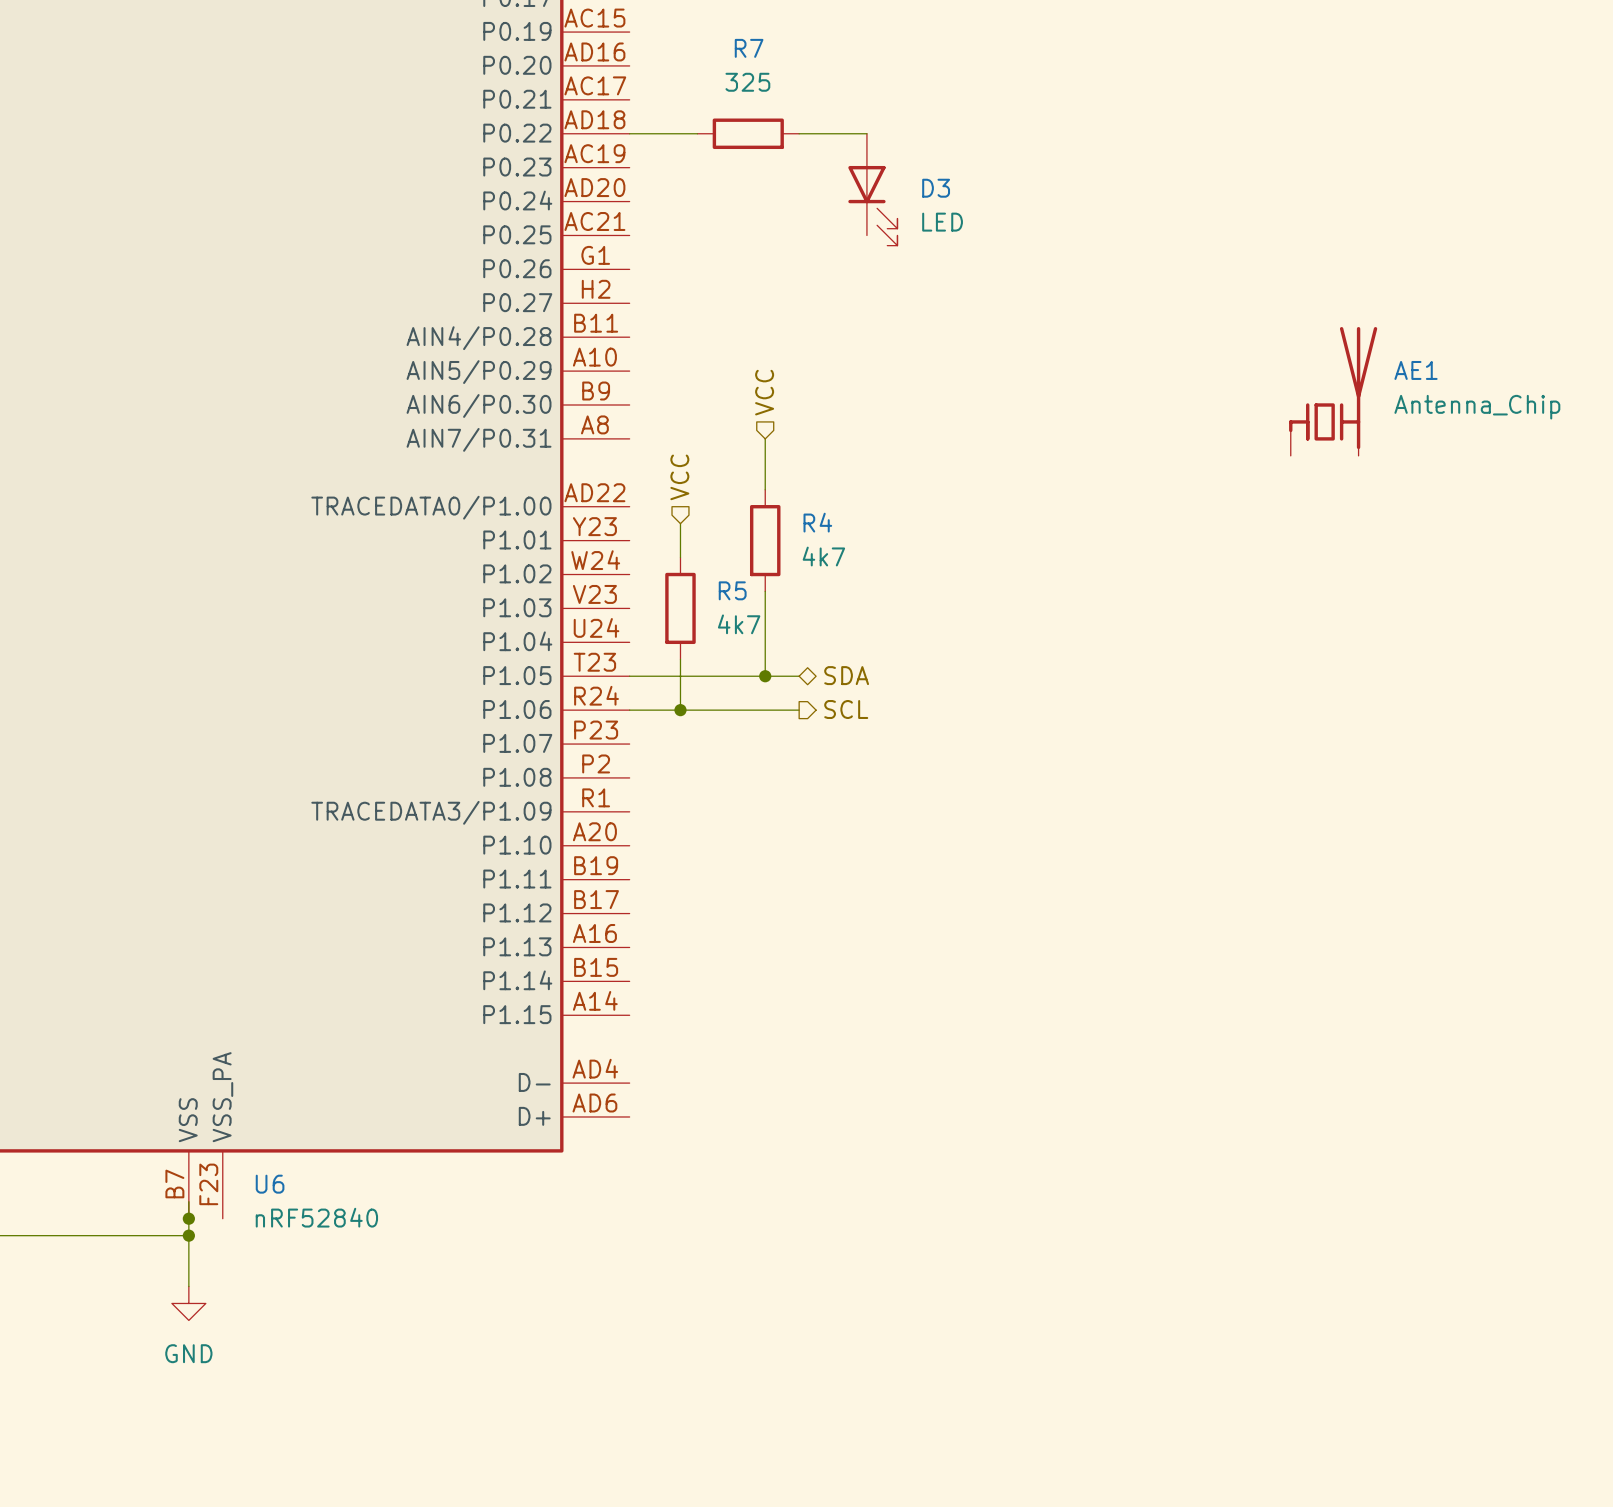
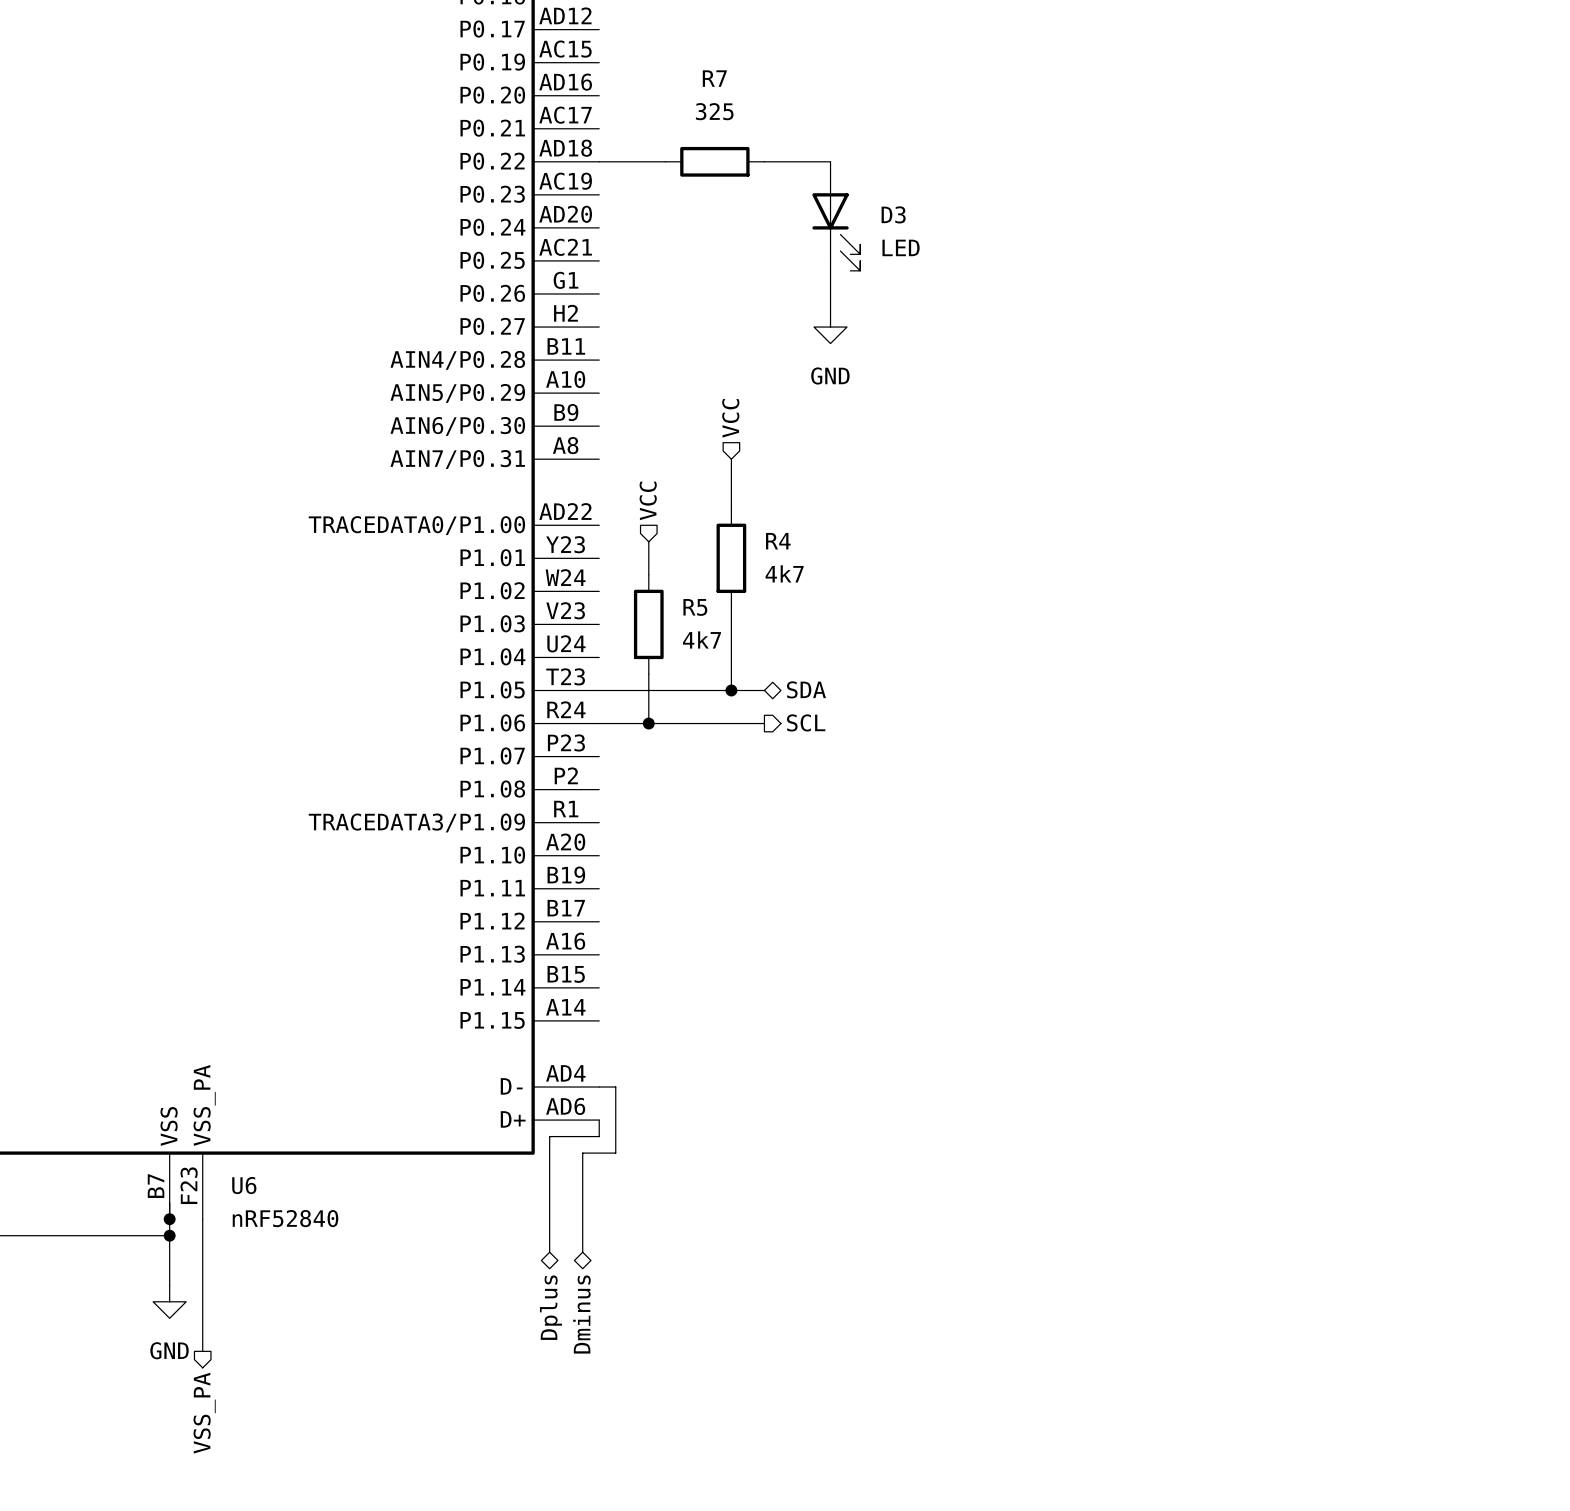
wire: none -> (830, 260) (830, 310)
power symbol: none -> GND (830, 327)
AE1: Antenna_Chip (1333, 391) -> none
wire: none -> (599, 1087) (615, 1087) (615, 1153) (582, 1153) (582, 1252)
wire: none -> (599, 1120) (599, 1136) (549, 1136) (549, 1252)
wire: none -> (202, 1219) (202, 1351)
hierarchical label: none -> Dplus (550, 1307)
hierarchical label: none -> Dminus (581, 1314)
hierarchical label: none -> VSS_PA (204, 1413)

